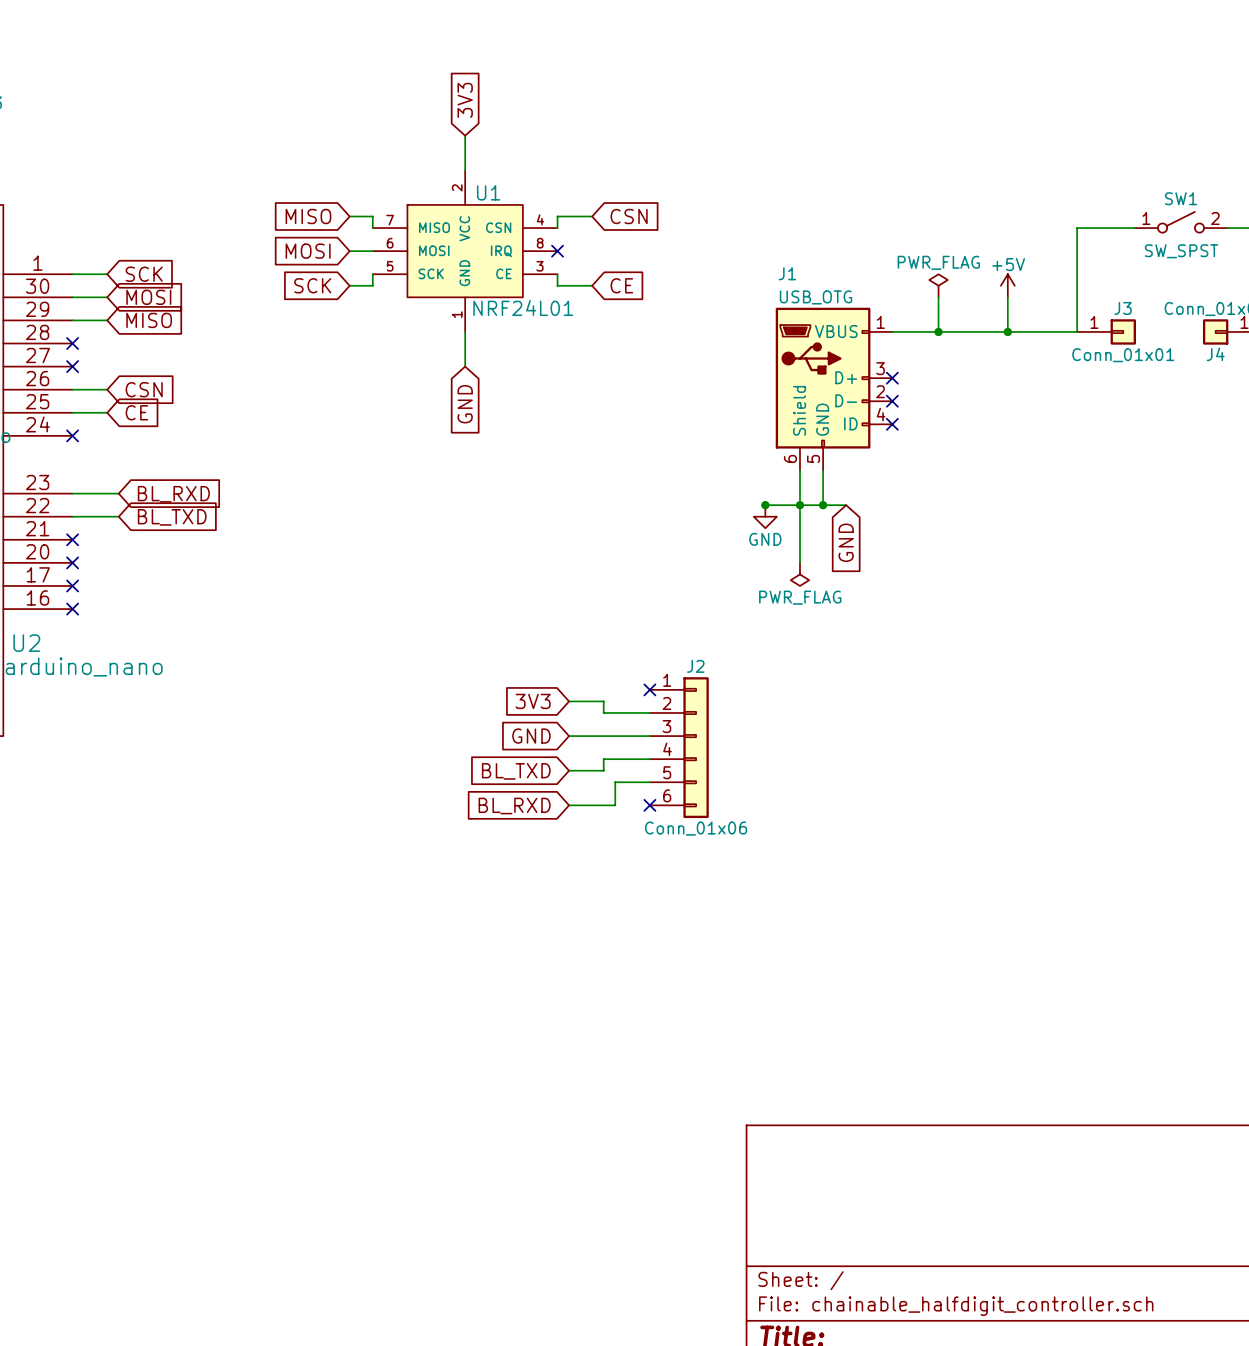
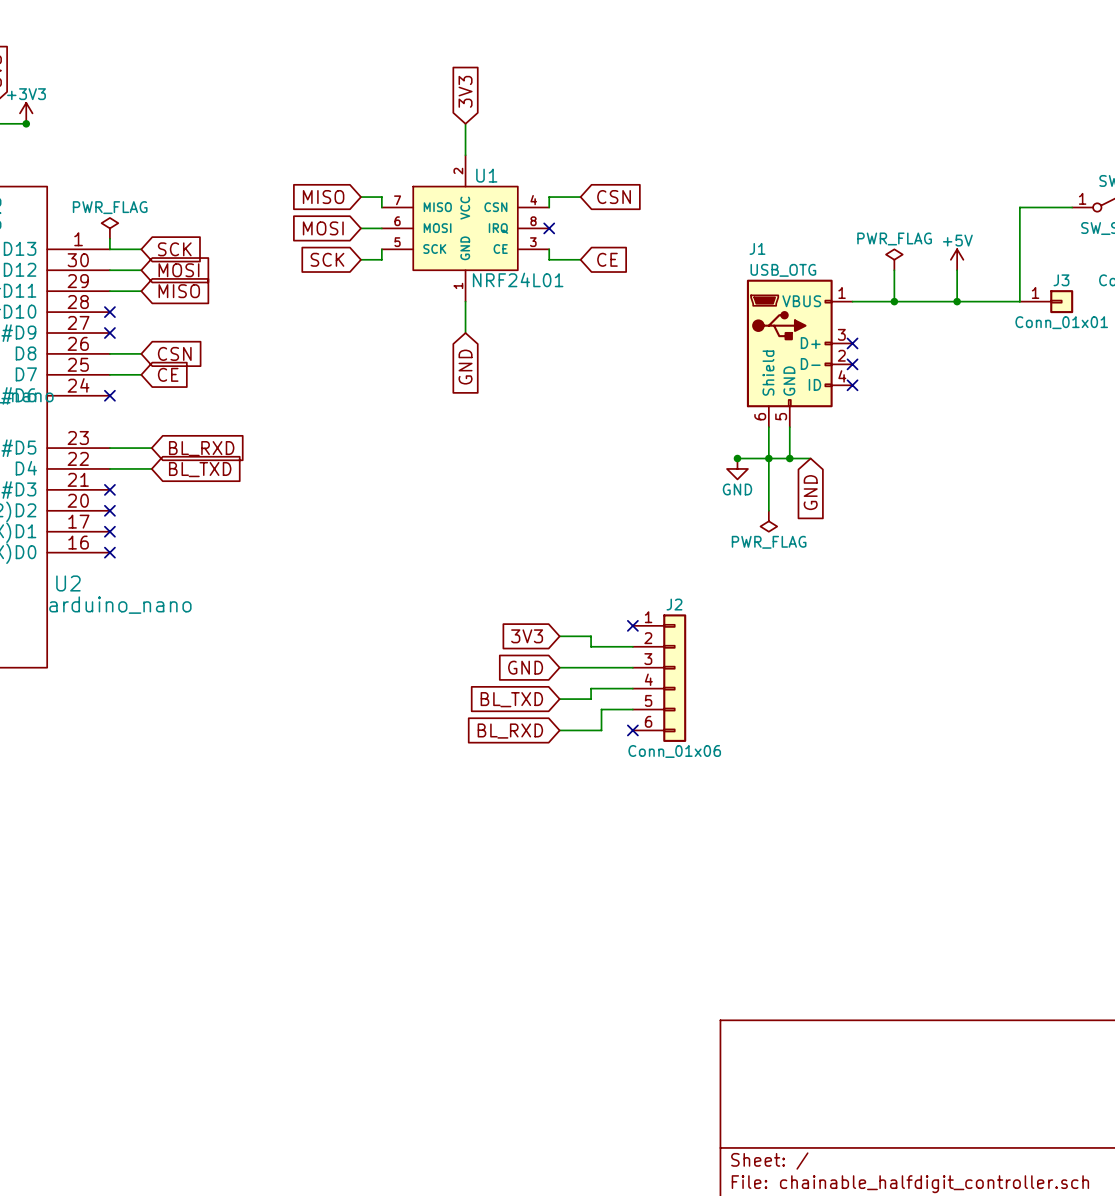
power symbol: none -> PWR_FLAG (109, 228)
wire: none -> (109, 238) (109, 249)

